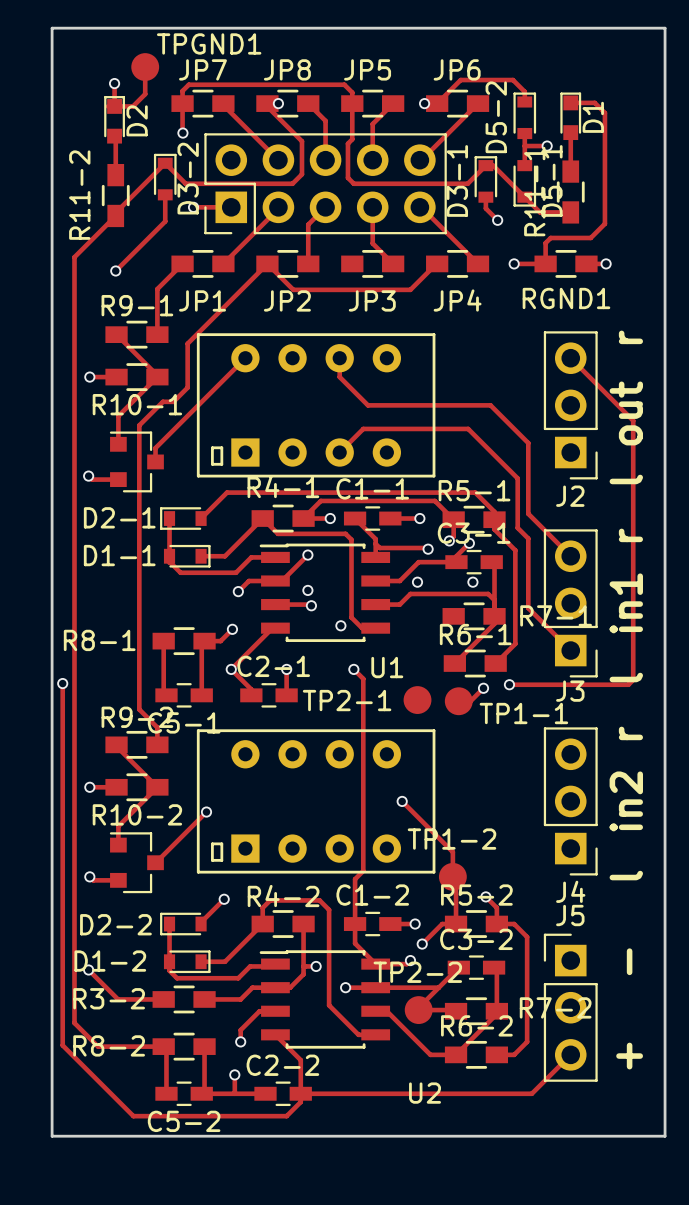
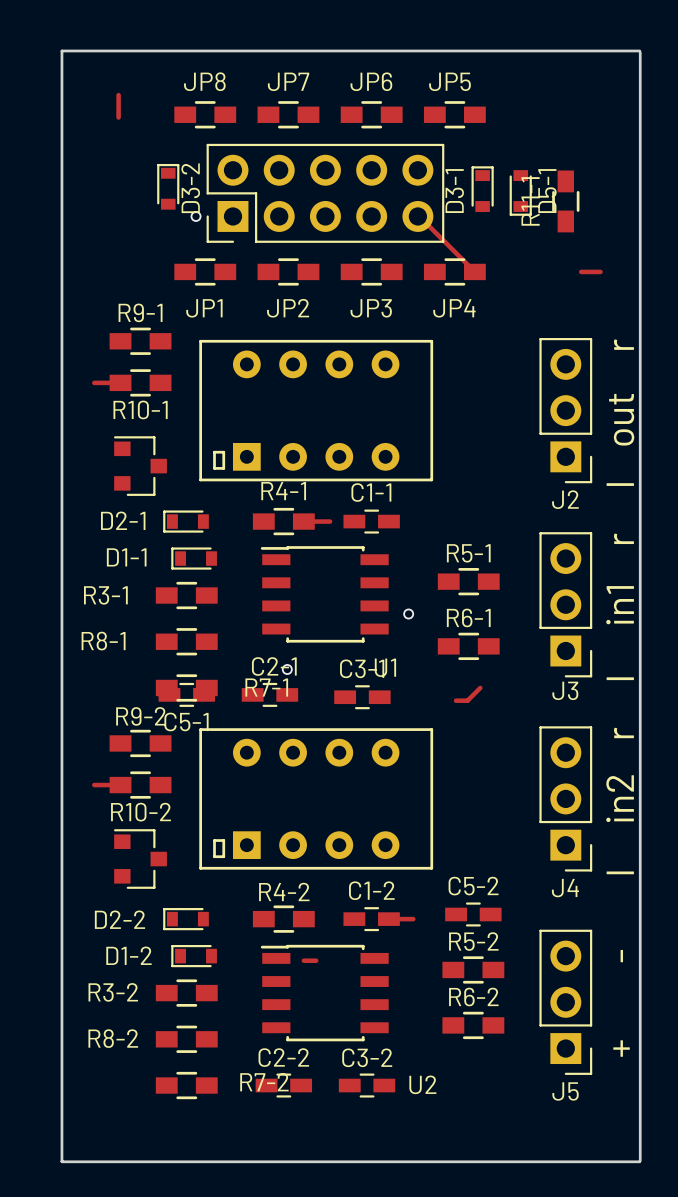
board edge: (52, 28) (52, 1136) (665, 1136) (665, 28) (52, 28) -> none
board edge: none -> (639, 50) (61, 50) (62, 1161)
board edge: none -> (640, 52) (640, 1160)
track: (145, 67) (145, 94) (132, 106) (107, 106) -> none
TPGND1: (145, 67) -> none
JP7 name: JP7 (202, 69) -> JP8 (204, 81)
JP8 name: JP8 (287, 69) -> JP7 (288, 81)
JP5 name: JP5 (367, 69) -> JP6 (371, 81)
JP6 name: JP6 (457, 69) -> JP5 (449, 81)
via: (114, 83) -> none
track: (524, 101) (524, 91) (512, 80) (460, 80) (437, 103) (424, 103) -> none
track: (570, 102) (594, 102) (604, 113) (604, 223) (590, 237) (550, 237) (545, 243) (545, 263) (514, 263) -> none
track: (223, 103) (278, 160) -> none
track: (278, 103) (267, 103) (267, 106) (301, 141) (301, 174) (292, 183) (185, 183) (165, 163) (74, 257) (74, 1023) (98, 1046) (163, 1046) (166, 1049) (166, 1093) -> none
via: (278, 103) -> none
track: (308, 103) (325, 120) (325, 160) -> none
track: (393, 103) (372, 124) (372, 160) -> none
via: (424, 103) -> none
track: (478, 103) (421, 160) -> none
D5-2: (524, 115) -> none
D1: (570, 116) -> none
D2: (114, 119) -> none
track: (570, 132) (570, 171) -> none
track: (182, 133) (182, 91) (188, 84) (344, 84) (352, 92) (352, 139) (347, 143) (347, 177) (353, 183) (467, 183) (485, 165) (493, 165) (540, 212) (570, 212) -> none
via: (182, 133) -> none
track: (524, 133) (524, 165) -> none
track: (114, 136) (115, 175) -> none
track: (524, 146) (547, 146) -> none
via: (547, 146) -> none
track: (165, 194) (165, 221) (115, 270) -> none
R11-2: (115, 195) -> none
track: (485, 197) (485, 208) (497, 220) -> none
track: (193, 207) (231, 207) -> none
track: (325, 207) (308, 224) (308, 263) -> none
track: (372, 207) (372, 243) (393, 263) -> none
track: (278, 208) (223, 263) -> none
via: (497, 220) -> none
track: (182, 263) (157, 289) (157, 334) -> none
track: (437, 263) (410, 289) (293, 289) (267, 263) (187, 343) (187, 387) (173, 401) (162, 401) (139, 425) (139, 709) (157, 727) (157, 744) -> none
via: (514, 263) -> none
RGND1: (566, 263) -> none
via: (606, 263) -> none
via: (115, 270) -> none
track: (116, 334) (157, 375) (118, 416) (118, 444) -> none
track: (245, 358) (155, 448) (155, 461) -> none
track: (339, 358) (339, 377) (368, 405) (490, 405) (528, 443) (528, 513) (570, 556) -> none
track: (570, 358) (633, 420) (633, 680) (628, 684) (509, 684) -> none
via: (89, 377) -> none
track: (339, 452) (363, 428) (468, 428) (517, 478) (517, 527) (528, 538) (528, 608) (570, 650) -> none
track: (88, 476) (92, 479) (118, 479) -> none
via: (88, 476) -> none
track: (169, 518) (169, 562) -> none
track: (201, 518) (227, 492) (475, 492) (494, 511) (494, 529) (515, 550) (515, 643) (495, 663) -> none
track: (303, 518) (320, 500) (434, 500) (453, 519) (453, 536) (449, 540) -> none
via: (330, 518) -> none
track: (355, 518) (375, 539) (375, 557) -> none
track: (390, 518) (419, 518) -> none
via: (419, 518) -> none
R5-1 position: (474, 519) -> (468, 581)
via: (449, 540) -> none
track: (375, 543) (379, 548) (428, 549) -> none
track: (469, 543) (456, 556) (456, 562) (418, 562) (399, 581) (375, 581) -> none
via: (469, 543) -> none
via: (428, 549) -> none
track: (307, 555) (281, 581) (248, 581) (238, 591) -> none
via: (307, 555) -> none
D1-1 rotation: 0° (187, 556) -> 180° (194, 558)
track: (201, 556) (224, 556) (262, 518) (278, 533) (345, 533) (351, 539) (351, 617) (362, 628) (375, 628) -> none
track: (275, 557) (251, 557) (235, 572) (180, 572) (169, 561) -> none
C3-1 position: (474, 562) -> (362, 697)
track: (491, 562) (494, 564) (494, 623) (454, 663) -> none
via position: (417, 582) -> (408, 614)
via: (472, 582) -> none
via: (307, 590) -> none
via: (238, 591) -> none
R3-1: none -> (186, 595)
track: (494, 600) (488, 593) (410, 593) (399, 604) (375, 604) -> none
track: (275, 604) (311, 605) -> none
via: (311, 605) -> none
R7-1 position: (474, 616) -> (186, 687)
via: (340, 625) -> none
track: (275, 628) (272, 628) (231, 669) (251, 689) (251, 695) -> none
track: (232, 629) (220, 641) (204, 641) (201, 643) (201, 695) -> none
via: (232, 629) -> none
track: (163, 641) (163, 692) (166, 695) -> none
R6-1 position: (475, 663) -> (468, 646)
via: (231, 669) -> none
track: (286, 669) (286, 695) -> none
track: (353, 669) (363, 678) (363, 870) (355, 879) (355, 943) (375, 964) (406, 964) (410, 960) -> none
via: (353, 669) -> none
track: (62, 683) (62, 1045) (133, 1116) (286, 1116) (300, 1102) (300, 1060) (275, 1034) -> none
via: (62, 683) -> none
via: (509, 684) -> none
via: (483, 688) -> none
TP2-1: (417, 700) -> none
TP1-1: (458, 701) -> none
track: (116, 744) (157, 787) (118, 826) (118, 845) -> none
via: (89, 787) -> none
track: (402, 801) (452, 852) (452, 876) (456, 880) (456, 924) (442, 924) (422, 944) -> none
via: (402, 801) -> none
track: (206, 812) (155, 862) -> none
via: (206, 812) -> none
track: (89, 876) (93, 880) (118, 880) -> none
via: (89, 876) -> none
TP1-2: (452, 876) -> none
track: (485, 896) (496, 907) (496, 924) (514, 924) (527, 936) (527, 1041) (514, 1054) (496, 1054) -> none
via: (485, 896) -> none
track: (224, 899) (201, 924) -> none
via: (224, 899) -> none
track: (169, 924) (169, 970) (177, 978) (238, 978) (250, 966) (273, 966) (275, 964) -> none
track: (303, 924) (303, 974) (290, 987) (252, 987) (240, 999) (204, 999) -> none
via: (415, 924) -> none
R5-2 position: (476, 924) -> (473, 969)
via: (422, 944) -> none
via: (410, 960) -> none
D1-2 rotation: 0° (187, 961) -> 180° (194, 956)
track: (201, 961) (224, 961) (262, 924) (262, 907) (270, 900) (319, 900) (329, 909) (329, 1005) (358, 1034) (375, 1034) -> none
via: (316, 966) -> none
track: (458, 967) (418, 1007) (418, 1010) (456, 1011) -> none
C3-2 position: (476, 967) -> (367, 1085)
track: (494, 967) (496, 970) (496, 1014) (456, 1054) (430, 1054) (386, 1011) (375, 1011) -> none
track: (88, 969) (118, 999) (163, 999) -> none
via: (88, 969) -> none
track: (345, 987) (438, 987) -> none
via: (345, 987) -> none
J5 rotation: 0° (570, 1007) -> 180° (565, 1002)
TP2-2: (418, 1010) -> none
track: (275, 1011) (259, 1011) (240, 1030) (240, 1041) -> none
R7-2 position: (476, 1011) -> (186, 1085)
via: (240, 1041) -> none
track: (205, 1045) (204, 1090) (201, 1093) (265, 1093) -> none
R6-2 position: (476, 1054) -> (473, 1025)
track: (570, 1054) (531, 1093) (300, 1093) -> none
track: (234, 1074) (234, 1093) -> none
via: (234, 1074) -> none
C5-2 position: (184, 1093) -> (473, 914)
C5-2 name position: C5-2 (184, 1121) -> C5-2 (473, 886)
board edge: none -> (61, 1161) (639, 1161)

